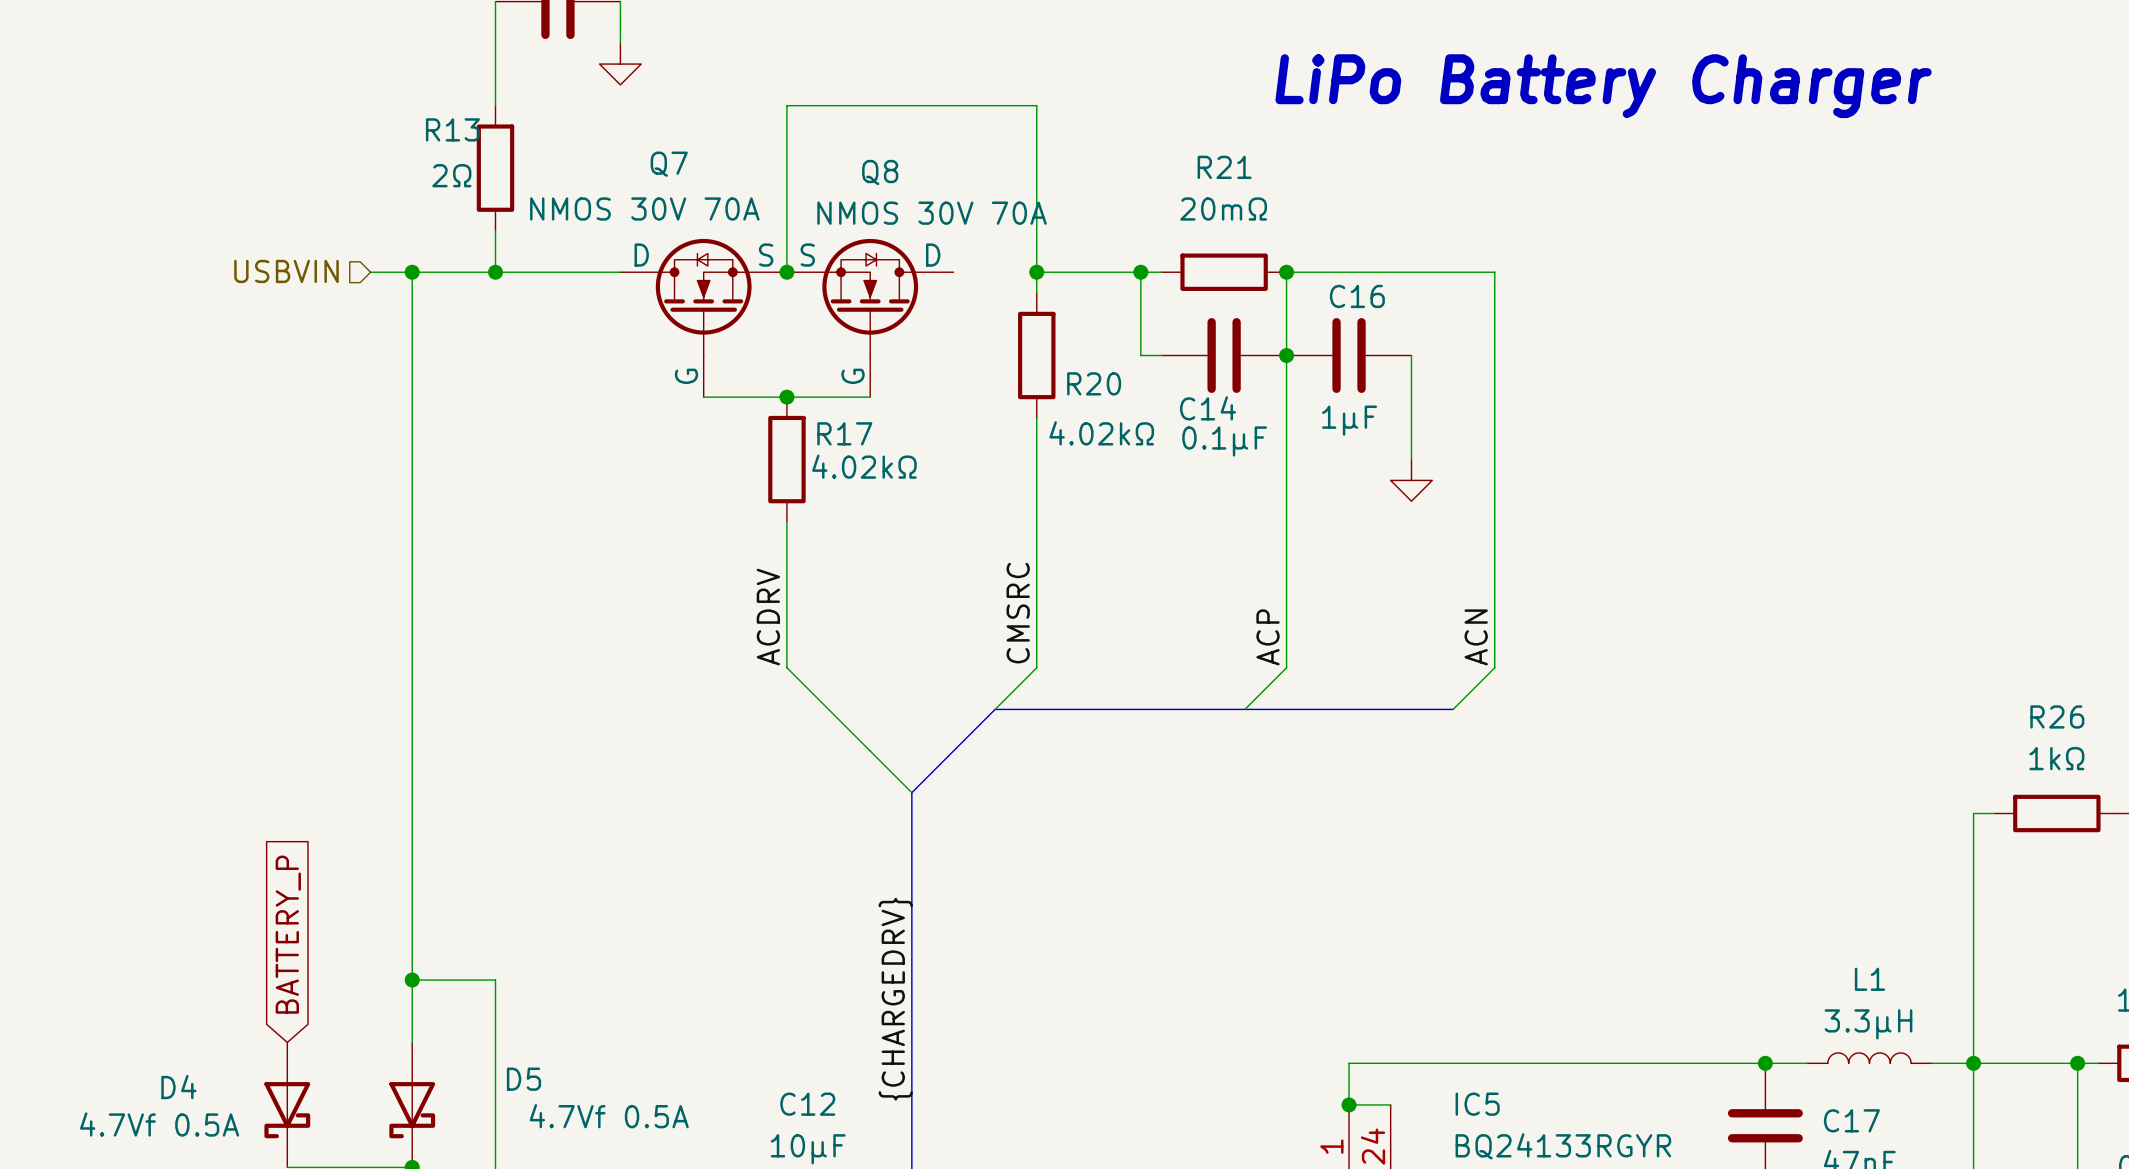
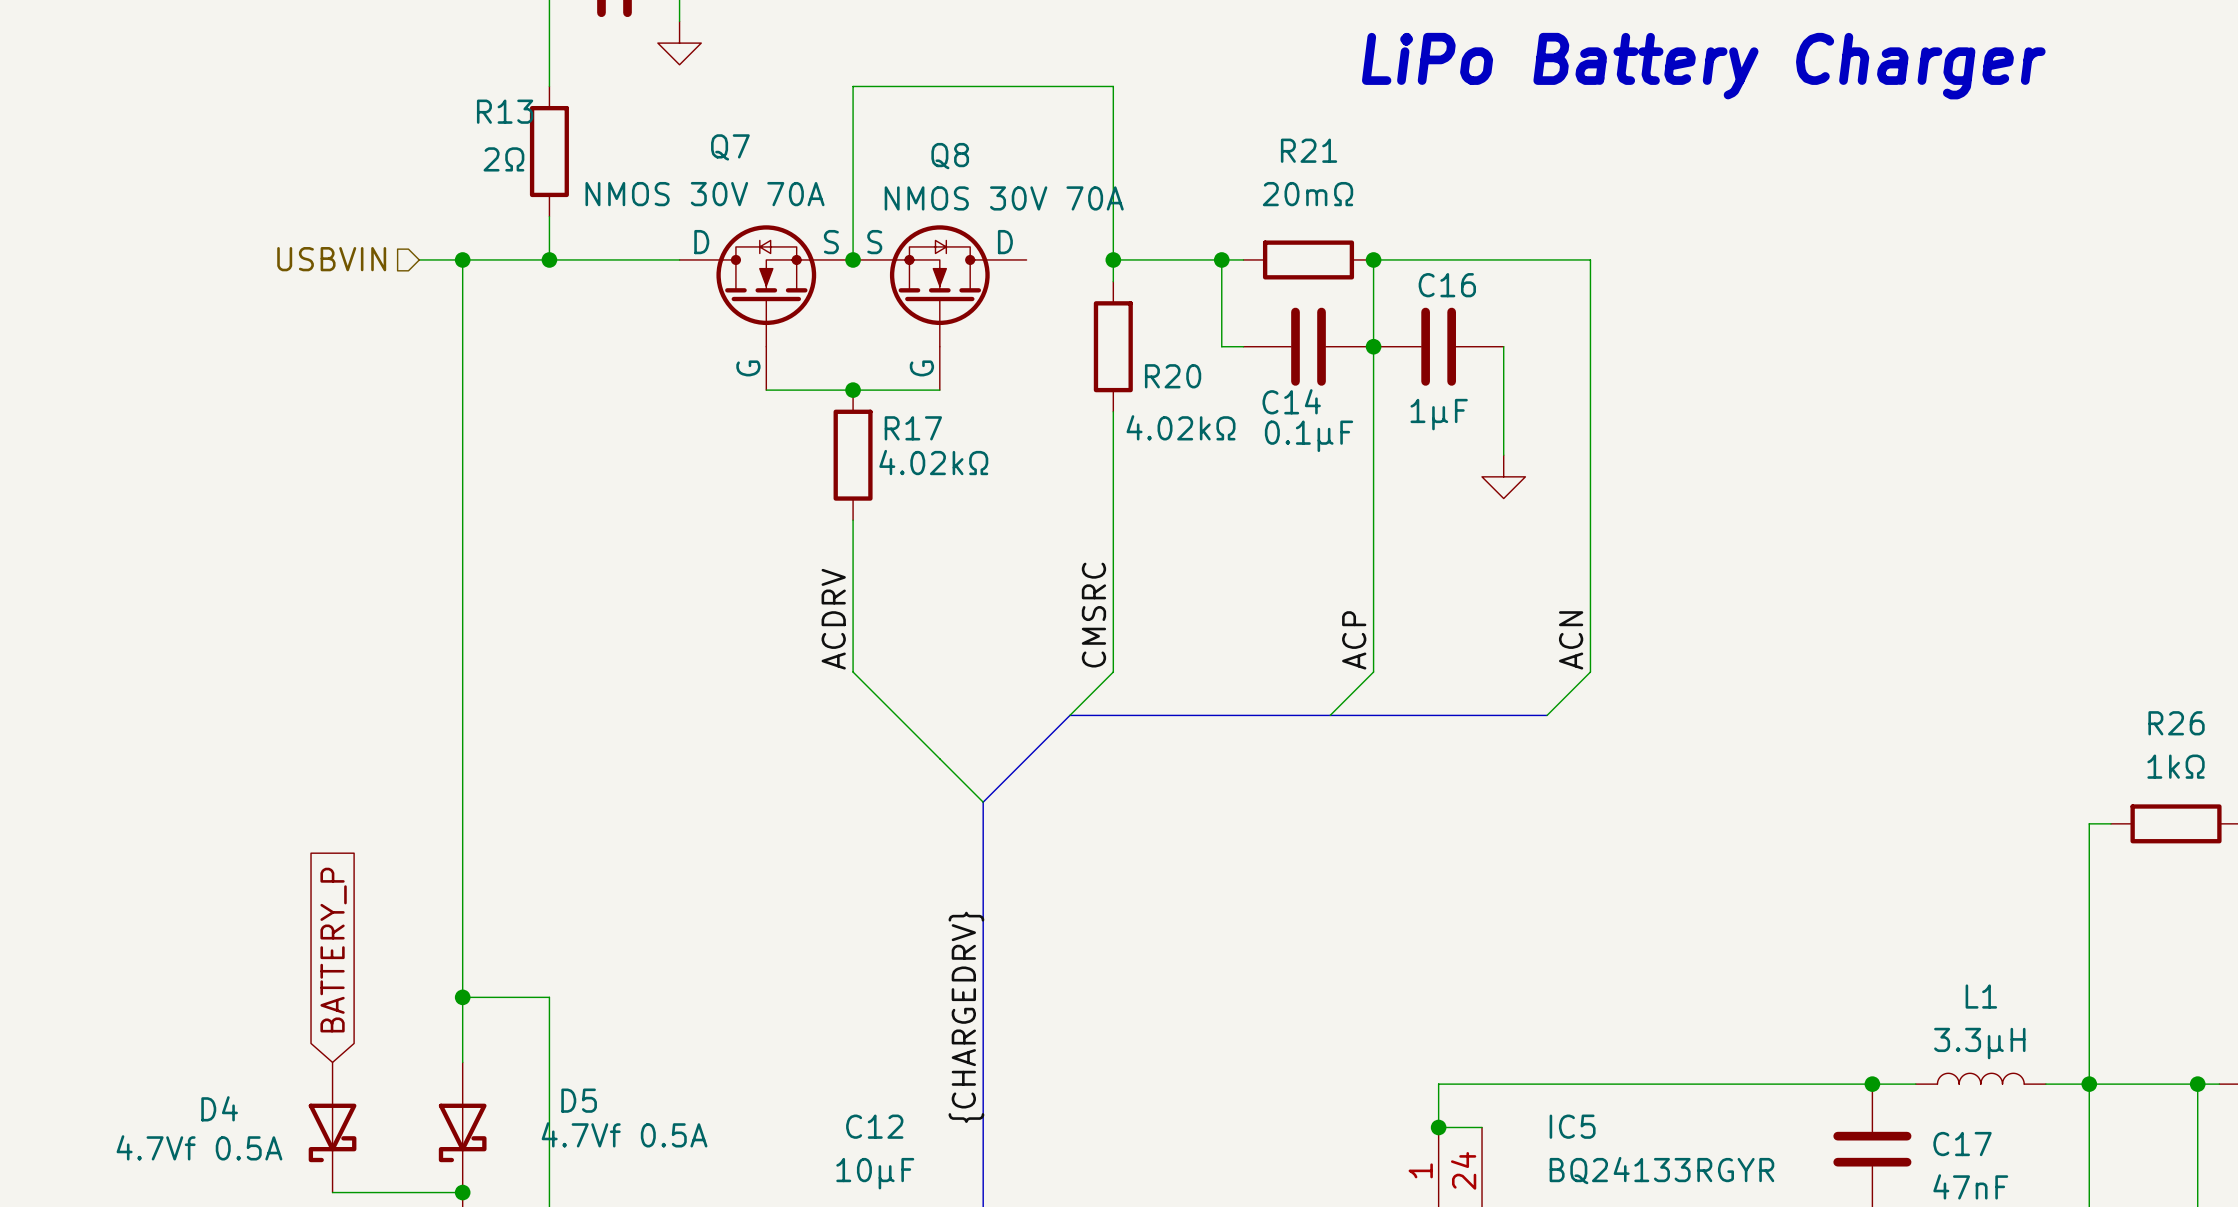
D5 value position: 4.7Vf 0.5A (609, 1116) -> 4.7Vf 0.5A (624, 1134)

